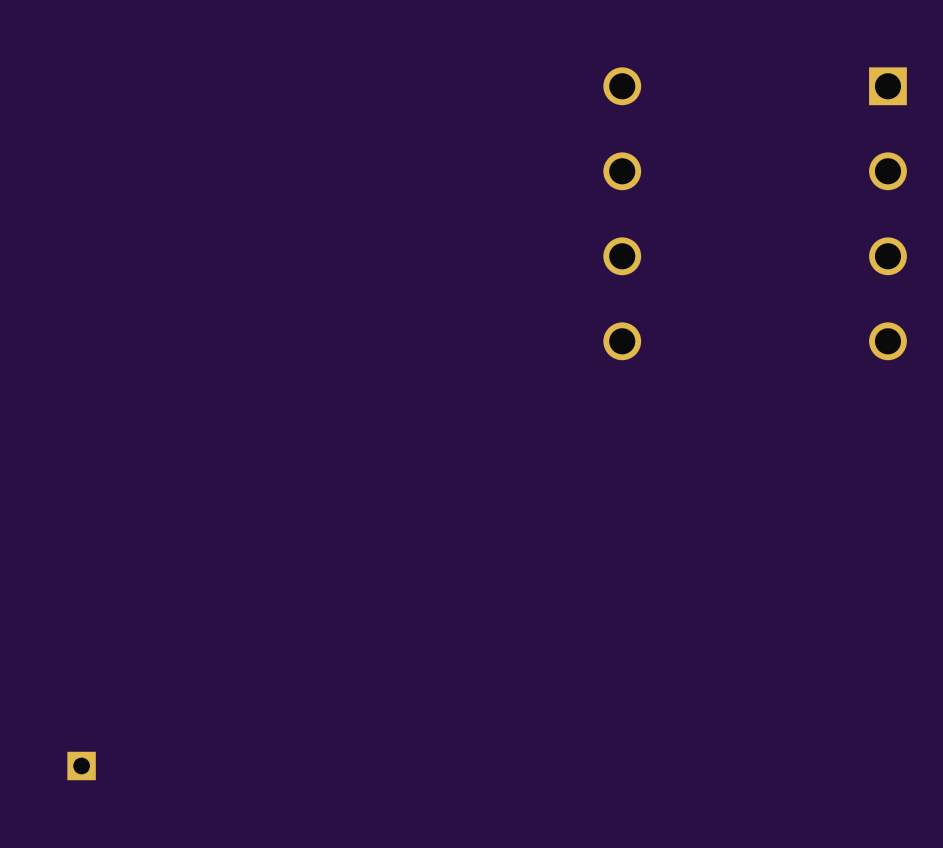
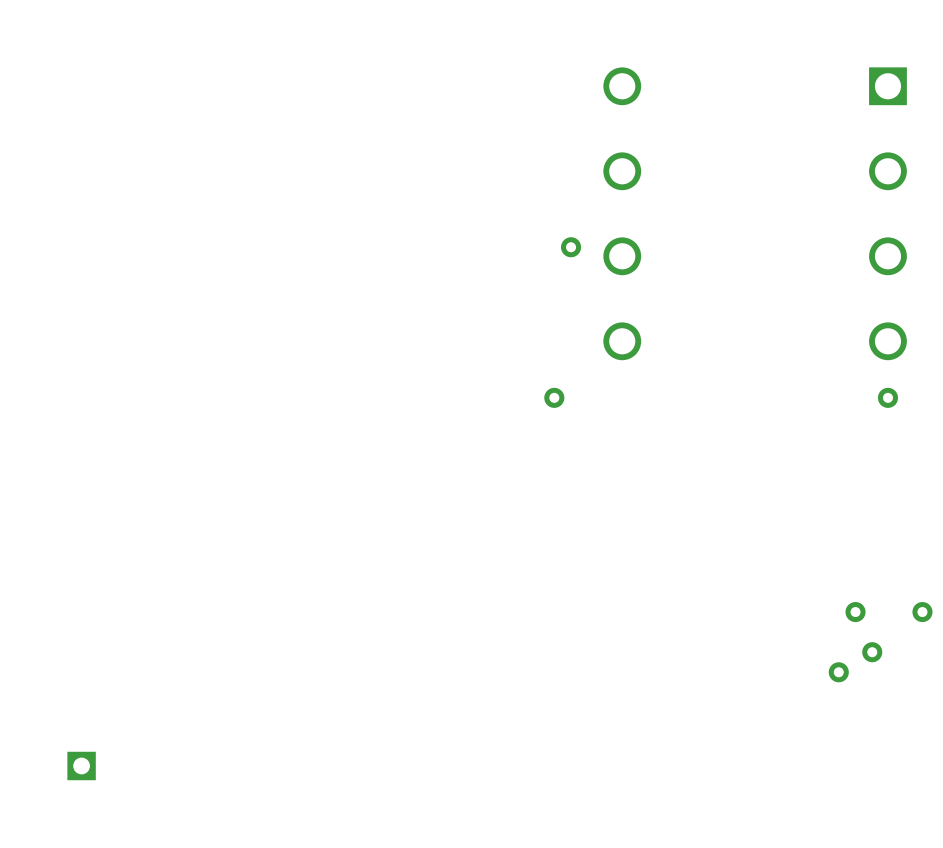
via: none -> (571, 247)
via: none -> (554, 397)
via: none -> (887, 397)
via: none -> (855, 612)
via: none -> (922, 612)
via: none -> (872, 652)
via: none -> (838, 672)

